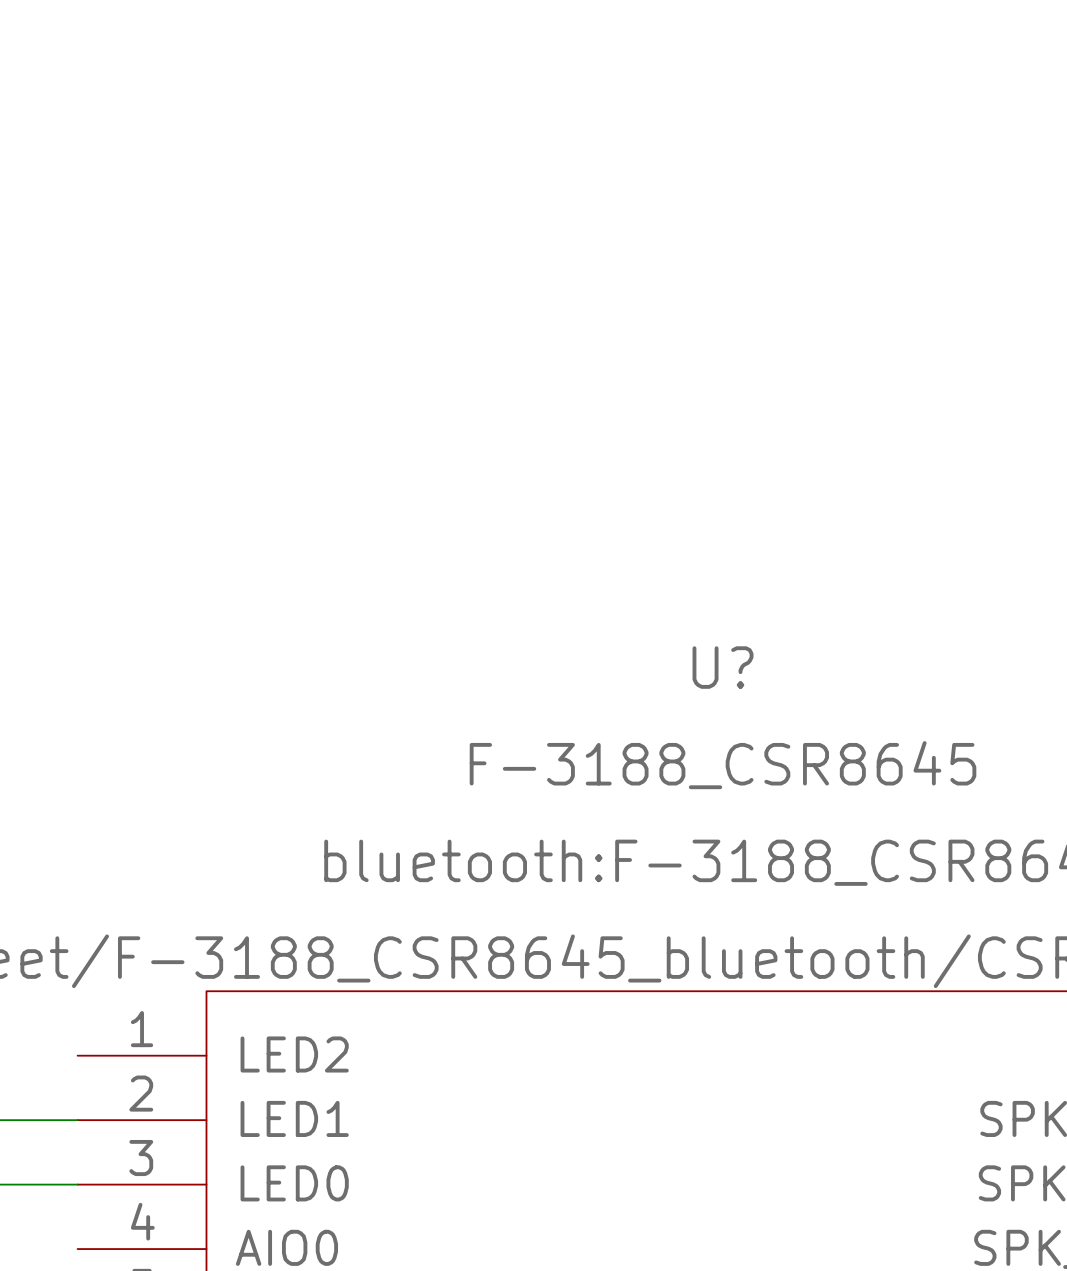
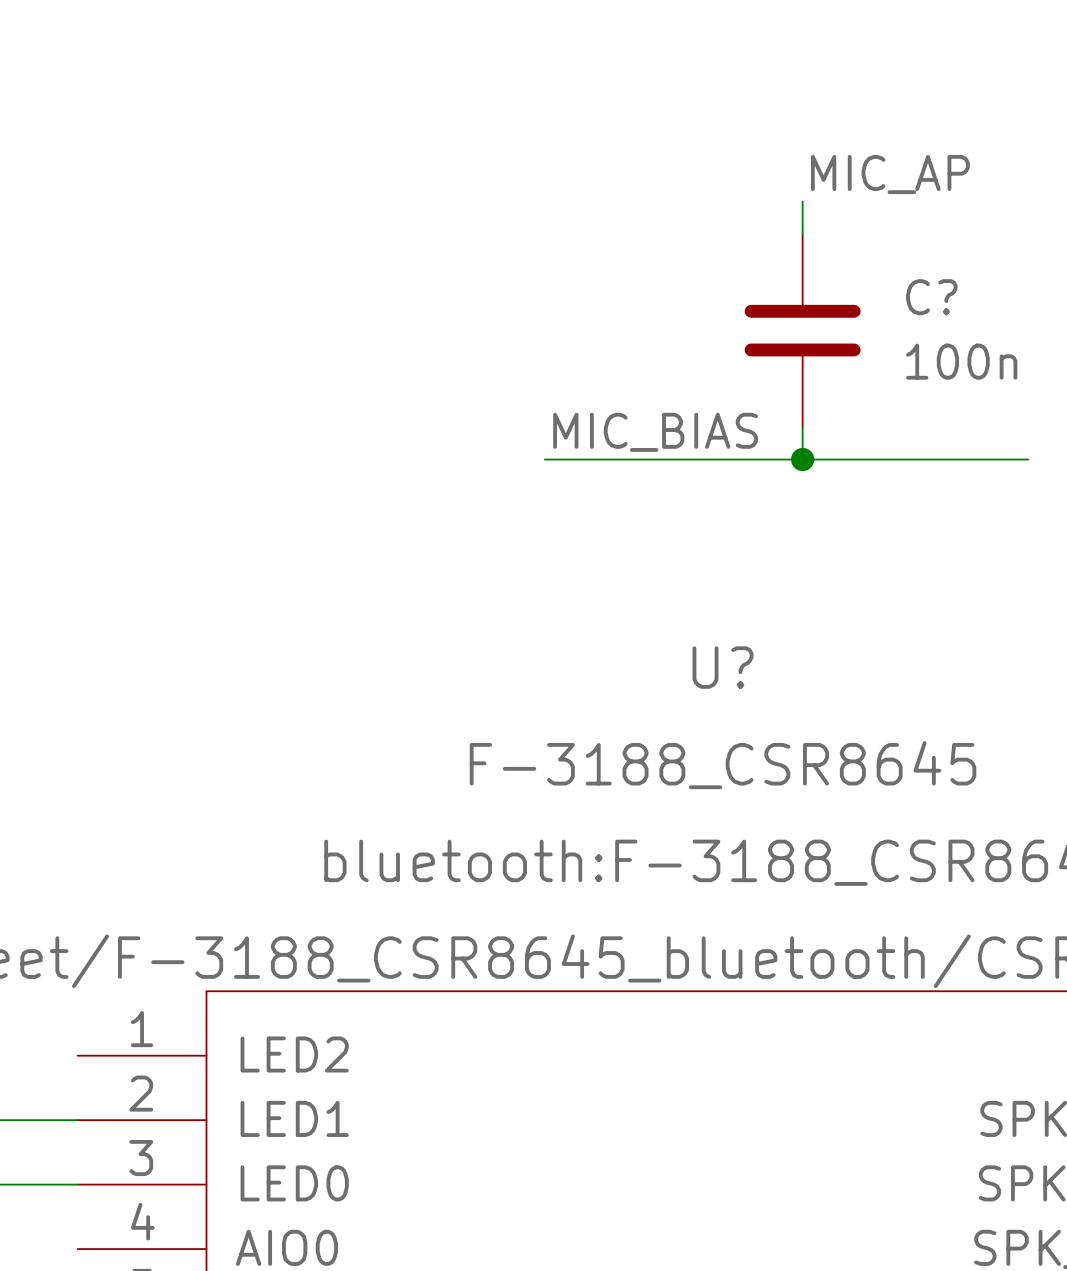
label: none -> MIC_AP (890, 174)
wire: none -> (802, 201) (802, 233)
C?: none -> 100n (802, 330)
wire: none -> (802, 427) (802, 459)
label: none -> MIC_BIAS (655, 432)
wire: none -> (544, 459) (1028, 459)
junction: none -> (802, 459)

